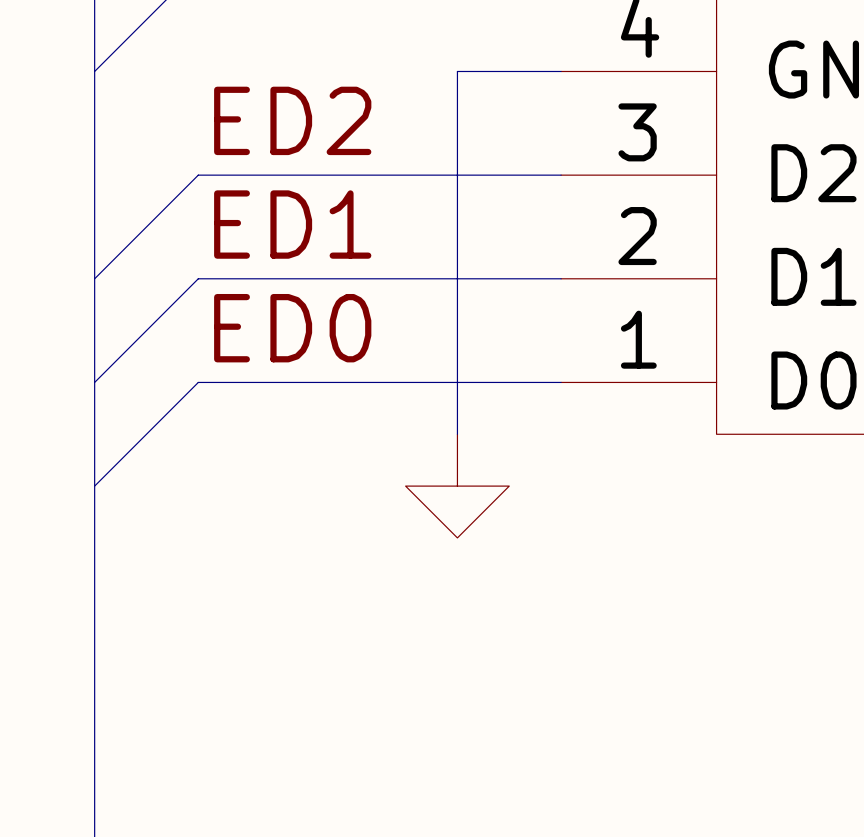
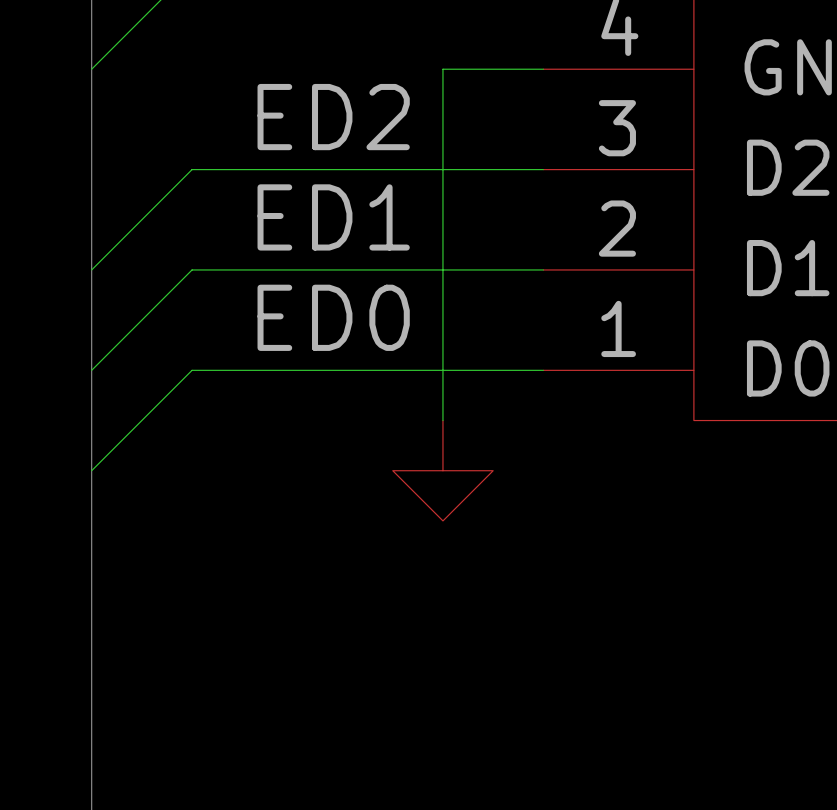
label position: ED2 (292, 120) -> ED2 (333, 117)
label position: ED1 (292, 224) -> ED1 (333, 217)
label position: ED0 (292, 328) -> ED0 (333, 317)

